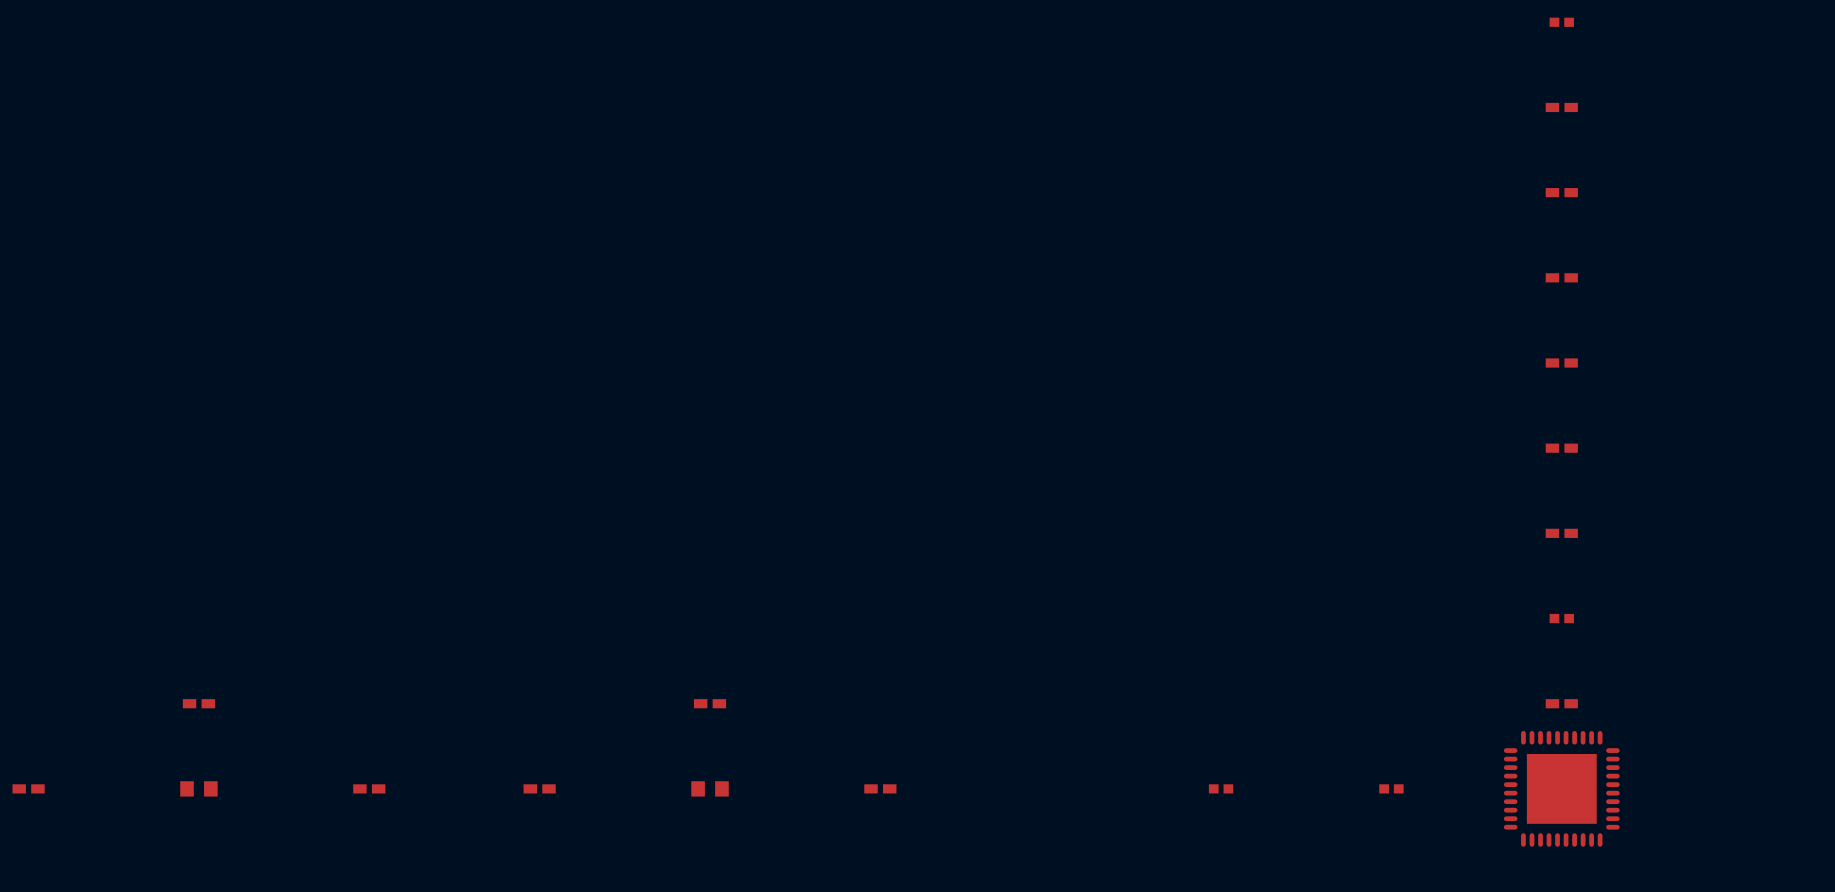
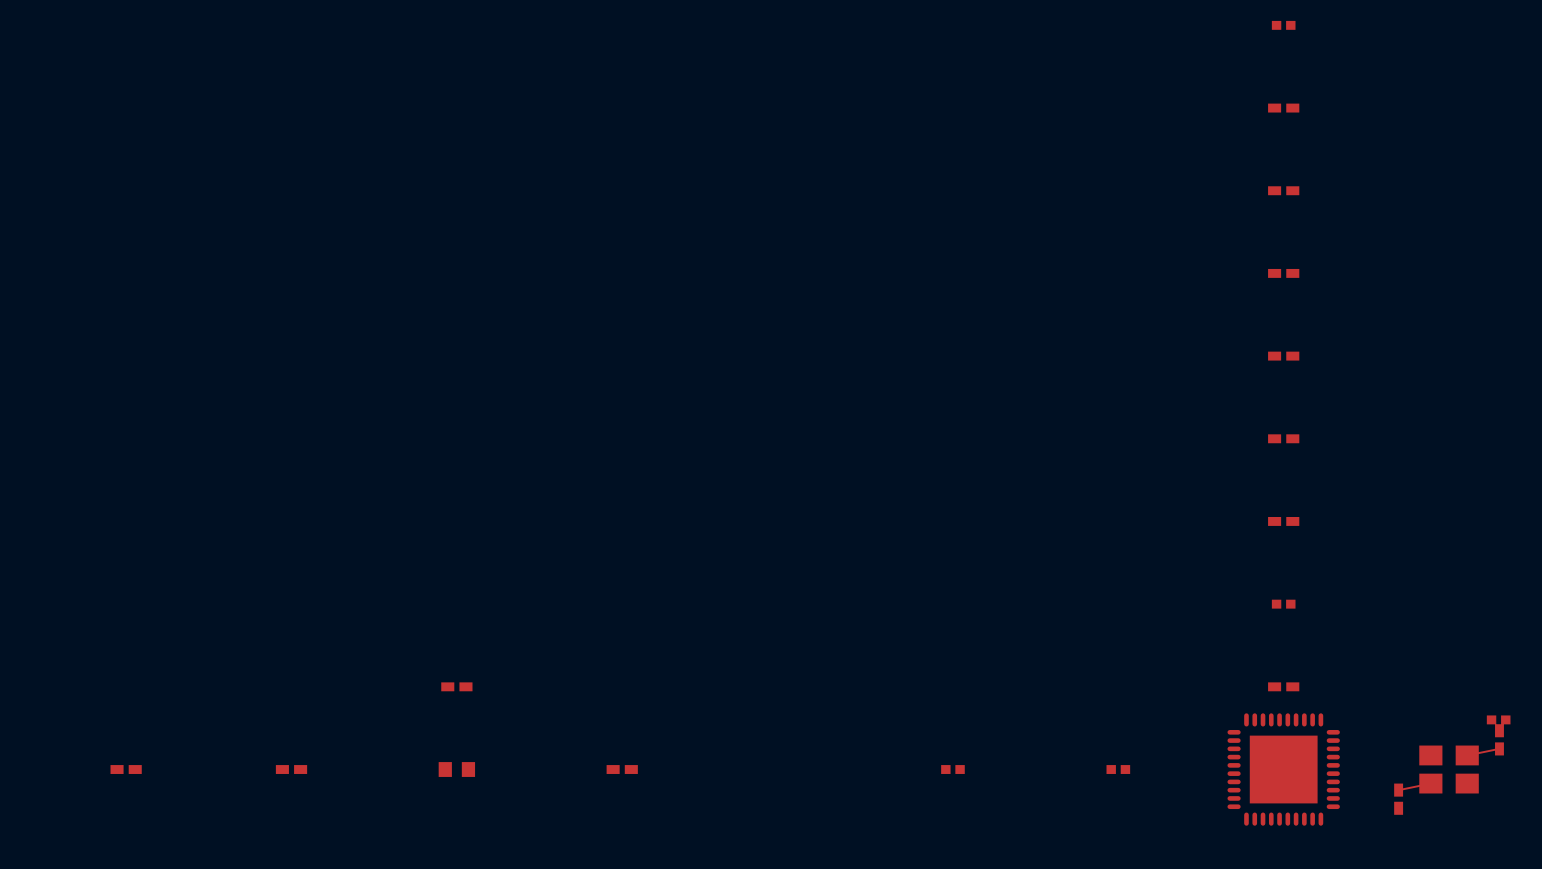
part: none -> (1498, 719)
part: none -> (1499, 739)
top track: none -> (1499, 748) (1467, 755)
part: none -> (1449, 769)
top track: none -> (1430, 783) (1398, 790)
part: none -> (1398, 799)

